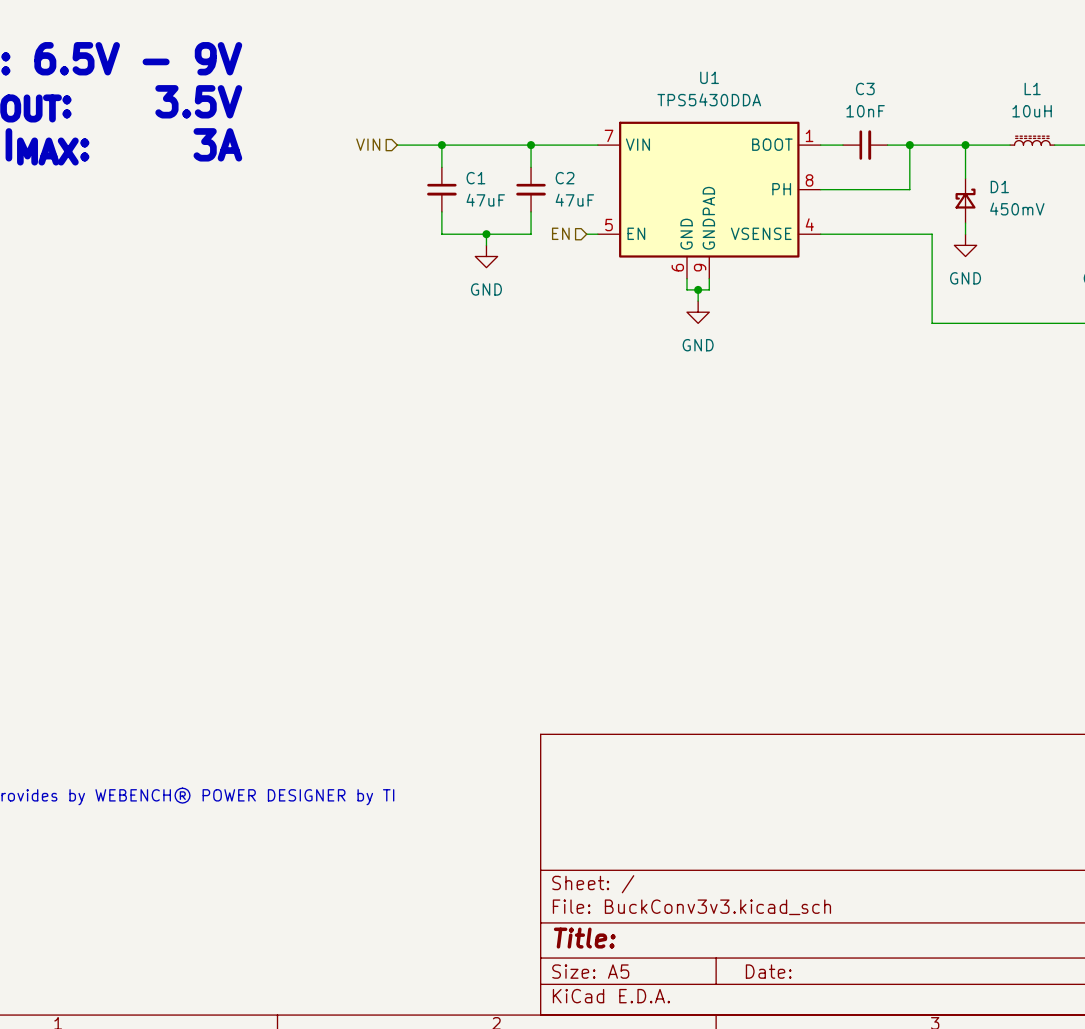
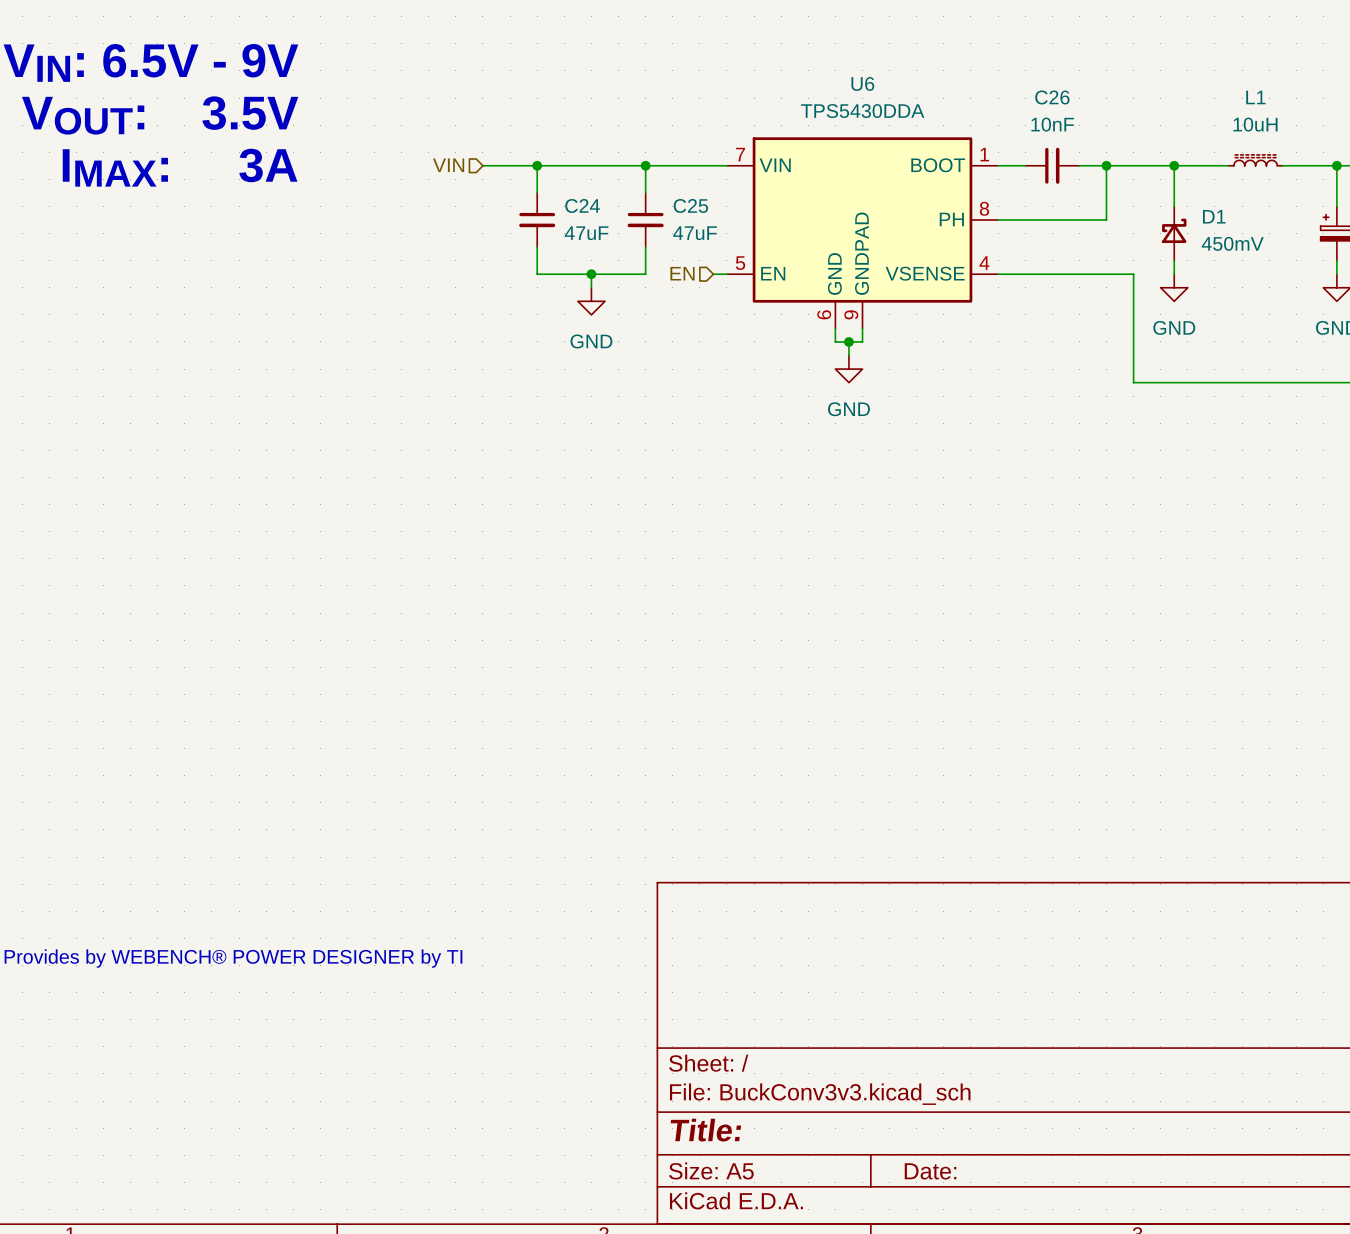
U1 name: U1 (709, 77) -> U6 (862, 83)
C3 name: C3 (865, 88) -> C26 (1052, 97)
C1 name: C1 (475, 178) -> C24 (582, 205)
C2 name: C2 (565, 178) -> C25 (690, 205)

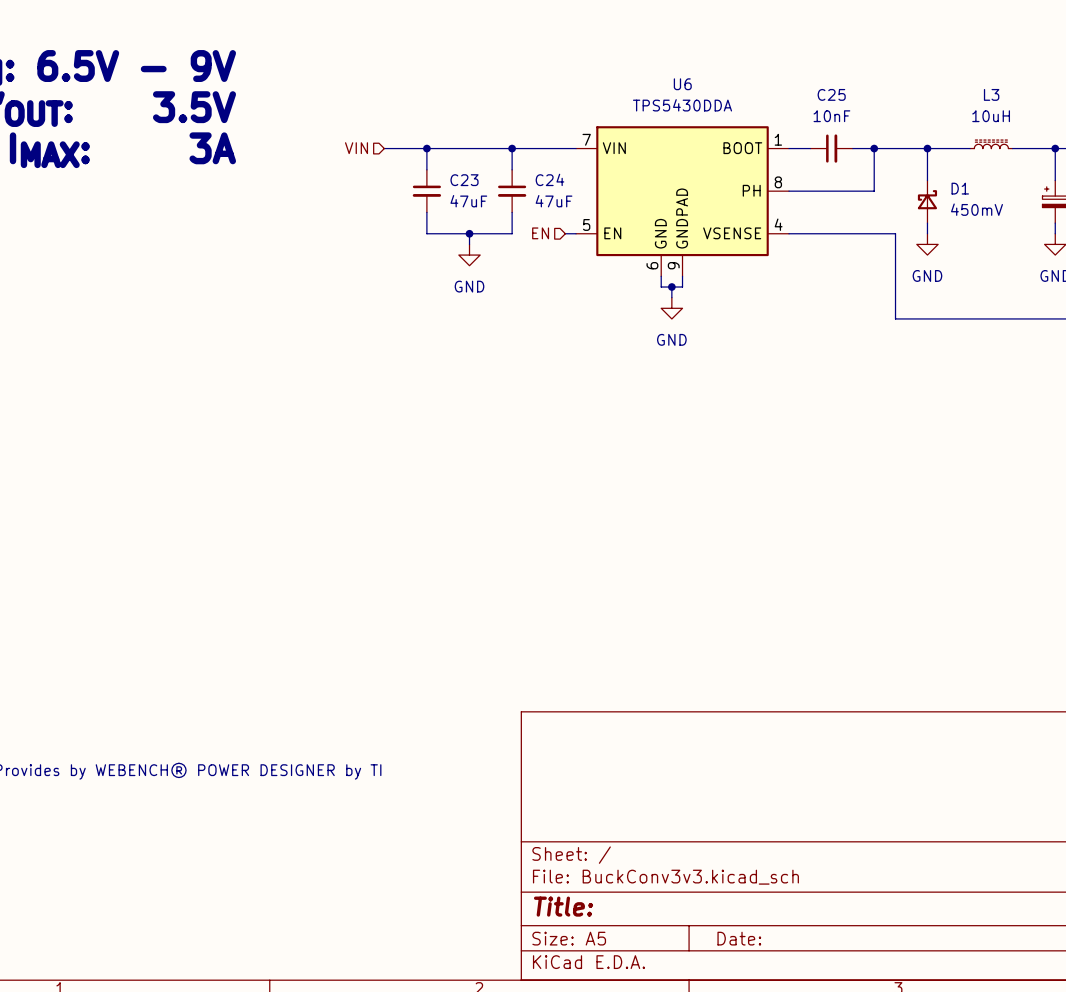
C26 name: C26 (1052, 97) -> C25 (831, 94)
L1 name: L1 (1255, 97) -> L3 (991, 94)
C24 name: C24 (582, 205) -> C23 (464, 180)
C25 name: C25 (690, 205) -> C24 (549, 179)

